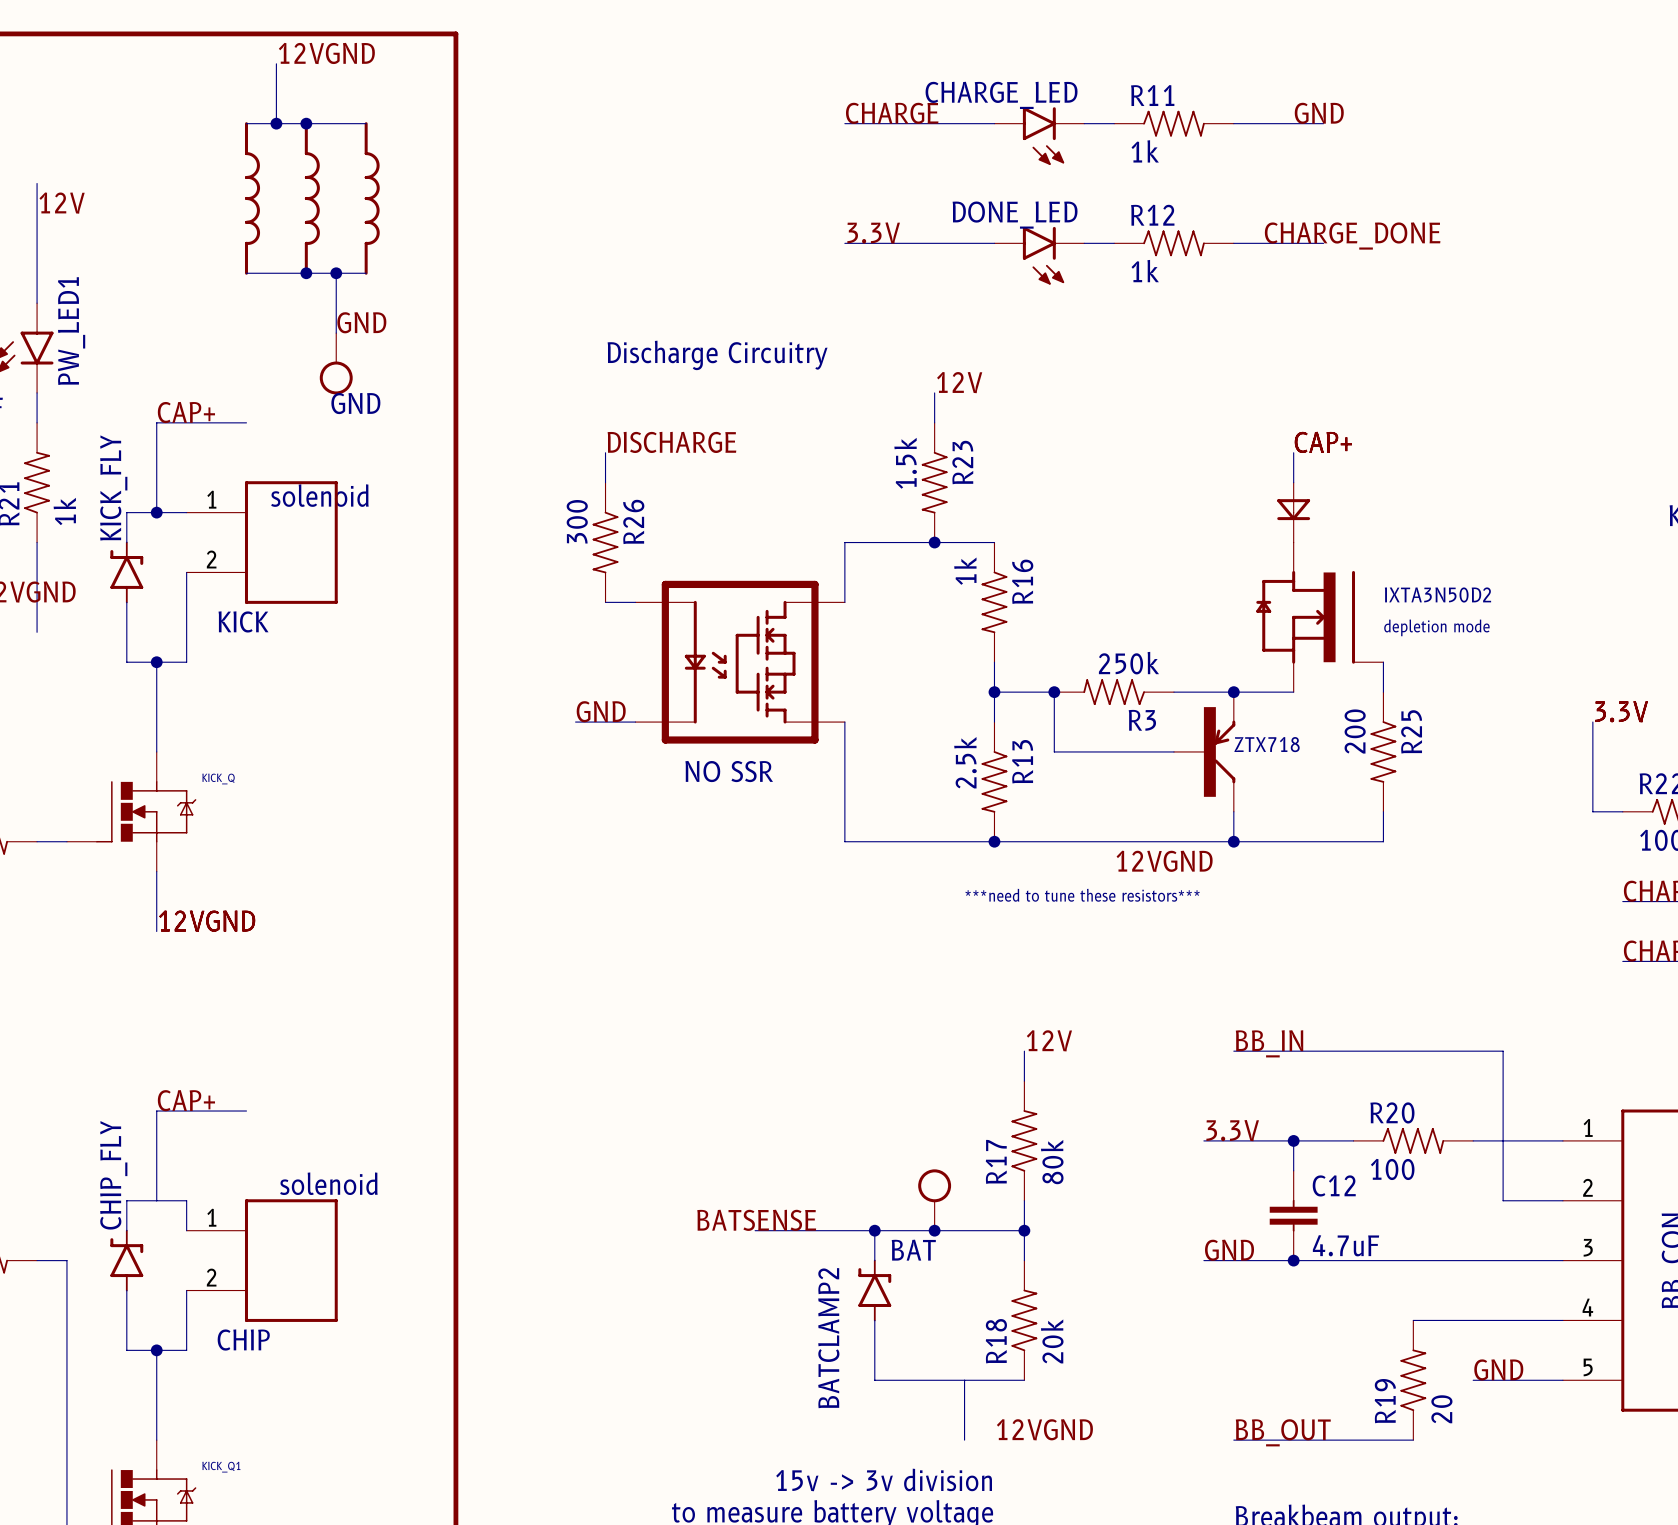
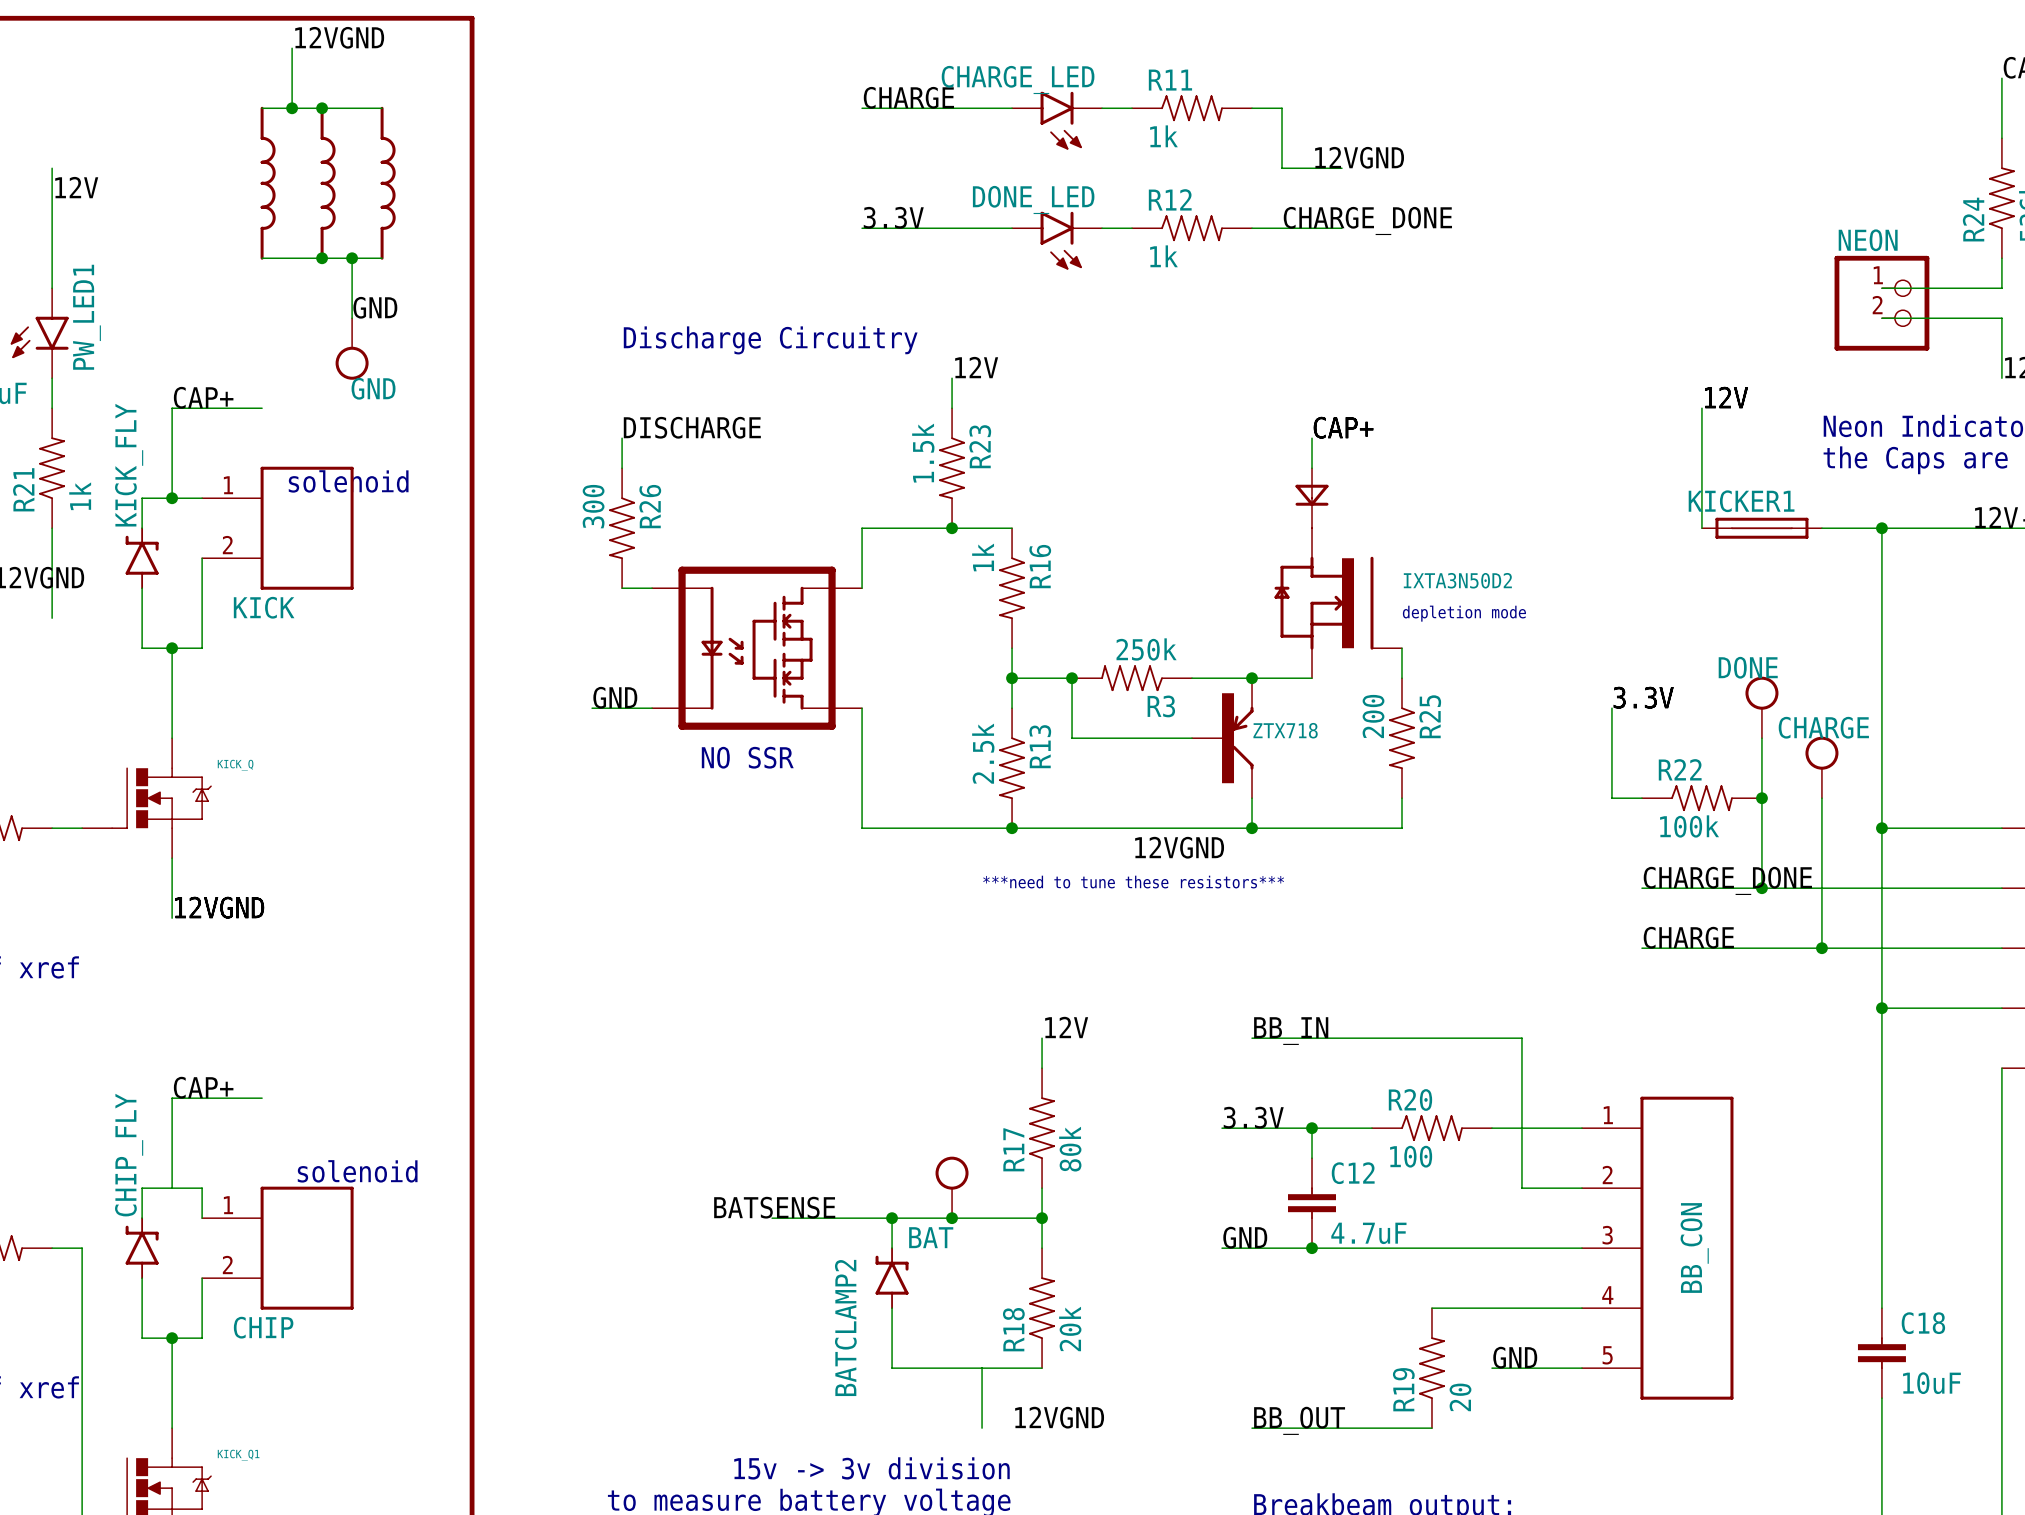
label: GND (1319, 113) -> none
wire: (1263, 123) (1323, 123) -> (1282, 108) (1282, 168) (1342, 168)
label: none -> 12VGND (1359, 157)

